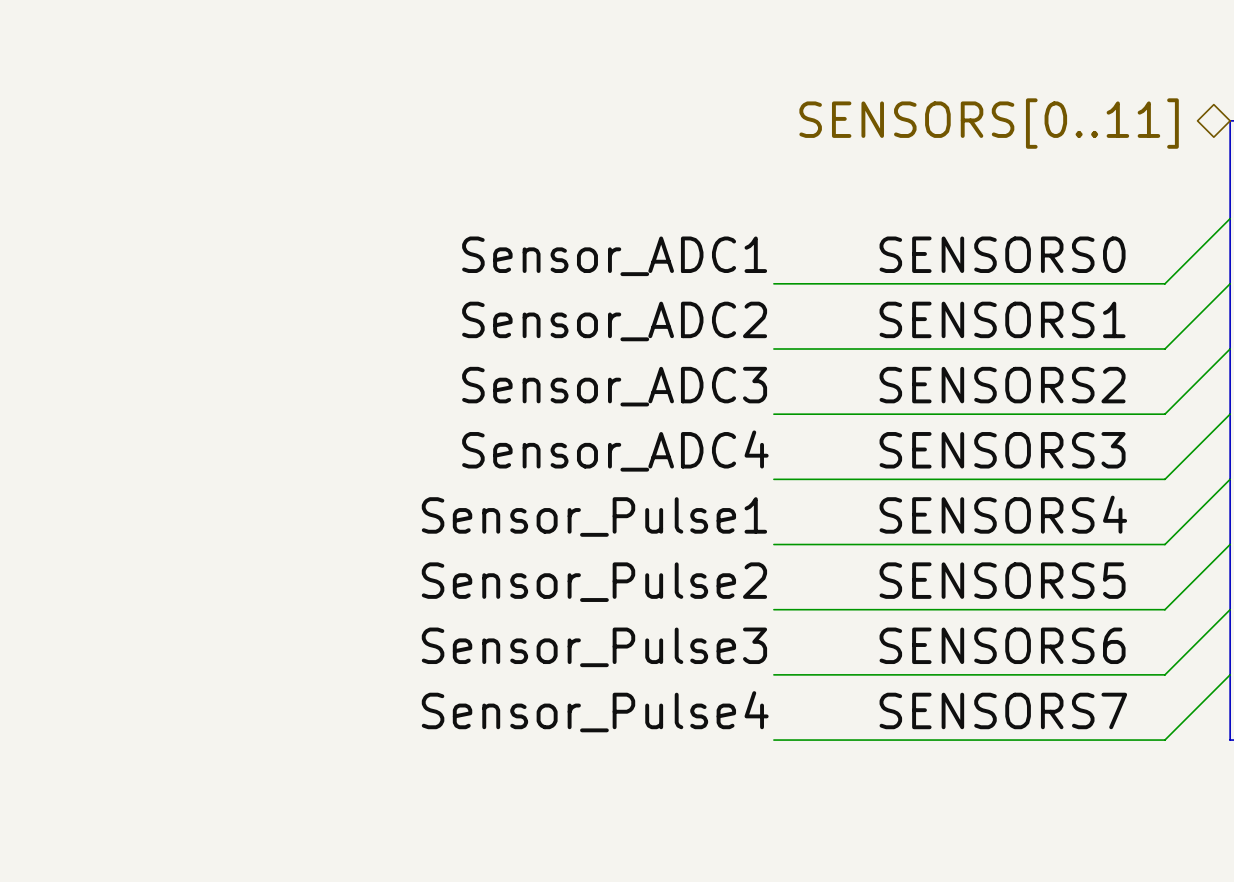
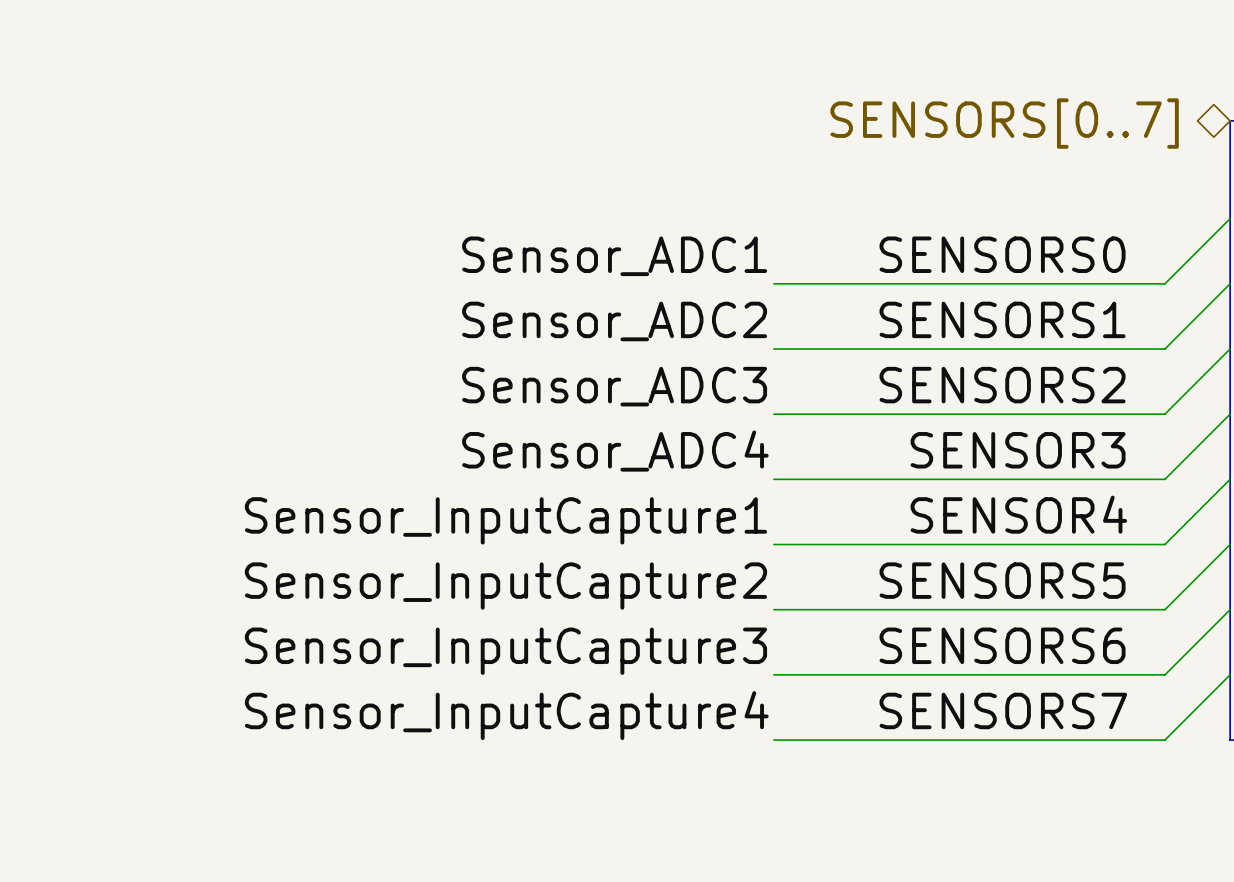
hierarchical label: SENSORS[0..11] (989, 123) -> SENSORS[0..7] (1004, 123)
label: SENSORS3 (1002, 450) -> SENSOR3 (1018, 450)
label: SENSORS4 (1003, 514) -> SENSOR4 (1018, 514)
label: Sensor_Pulse1 (594, 516) -> Sensor_InputCapture1 (505, 520)
label: Sensor_Pulse2 (594, 582) -> Sensor_InputCapture2 (505, 586)
label: Sensor_Pulse3 (594, 647) -> Sensor_InputCapture3 (505, 651)
label: Sensor_Pulse4 (595, 711) -> Sensor_InputCapture4 (506, 715)

